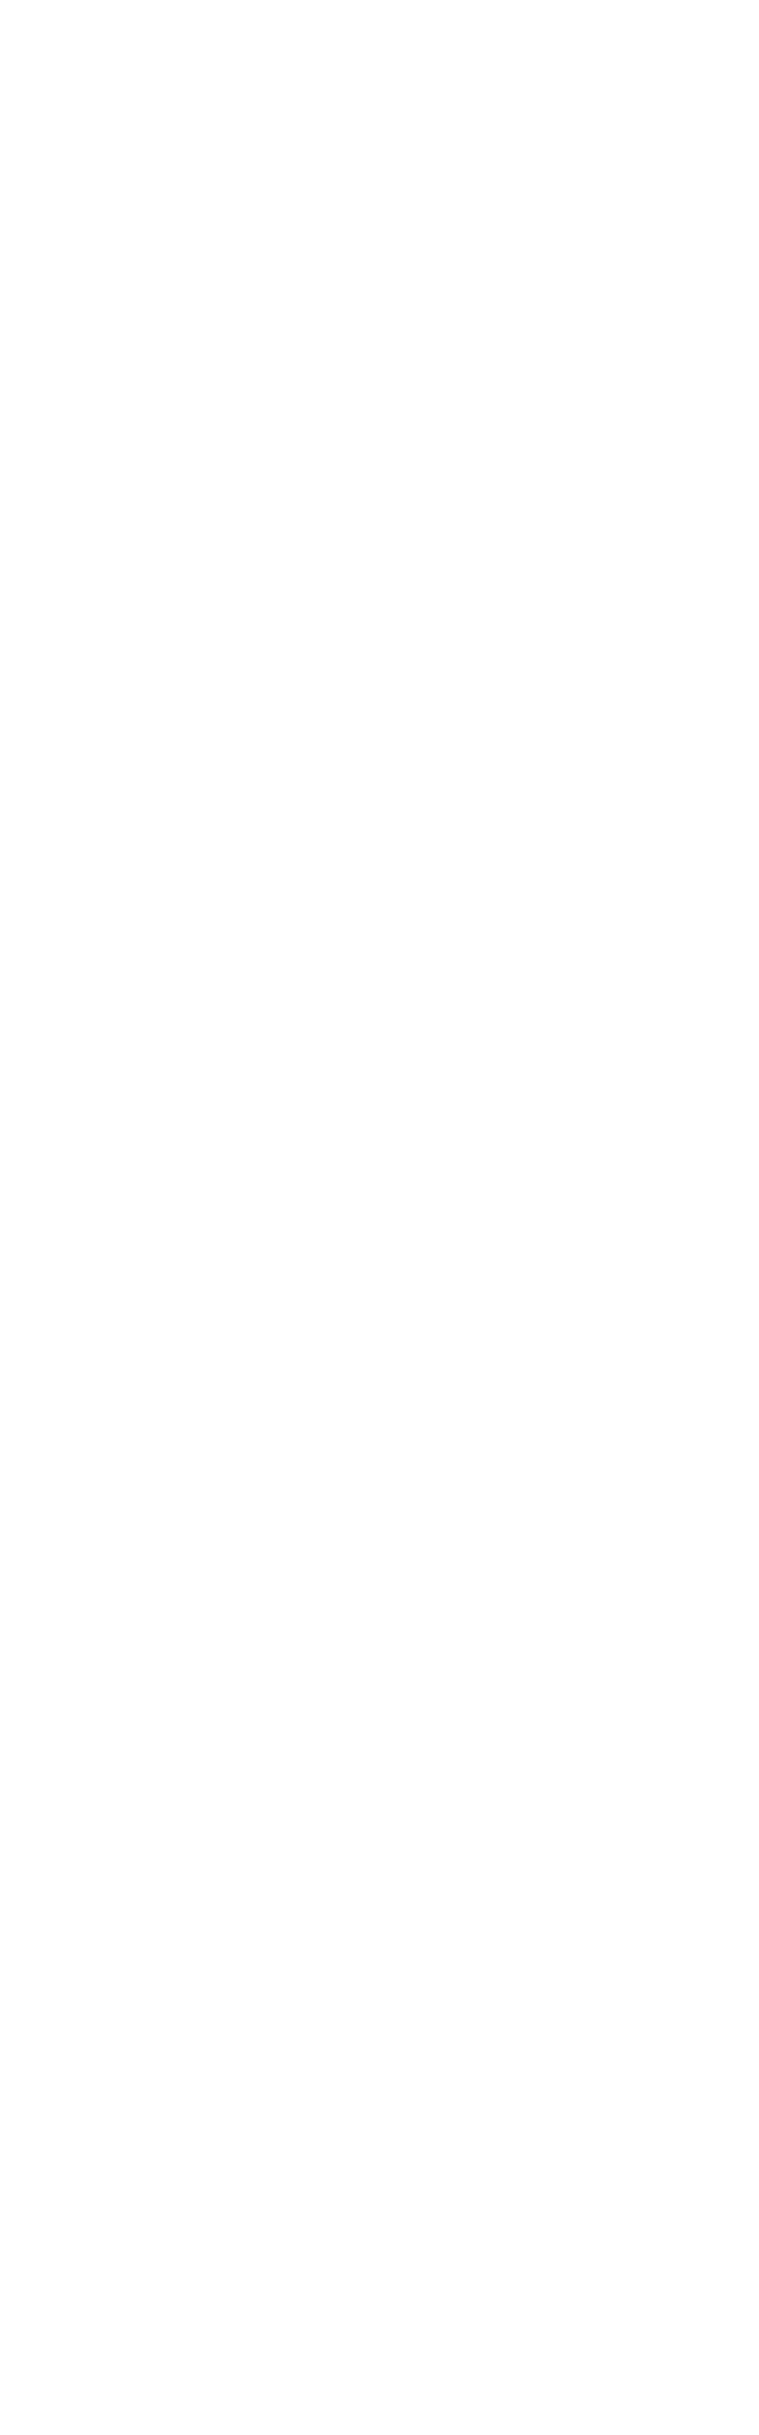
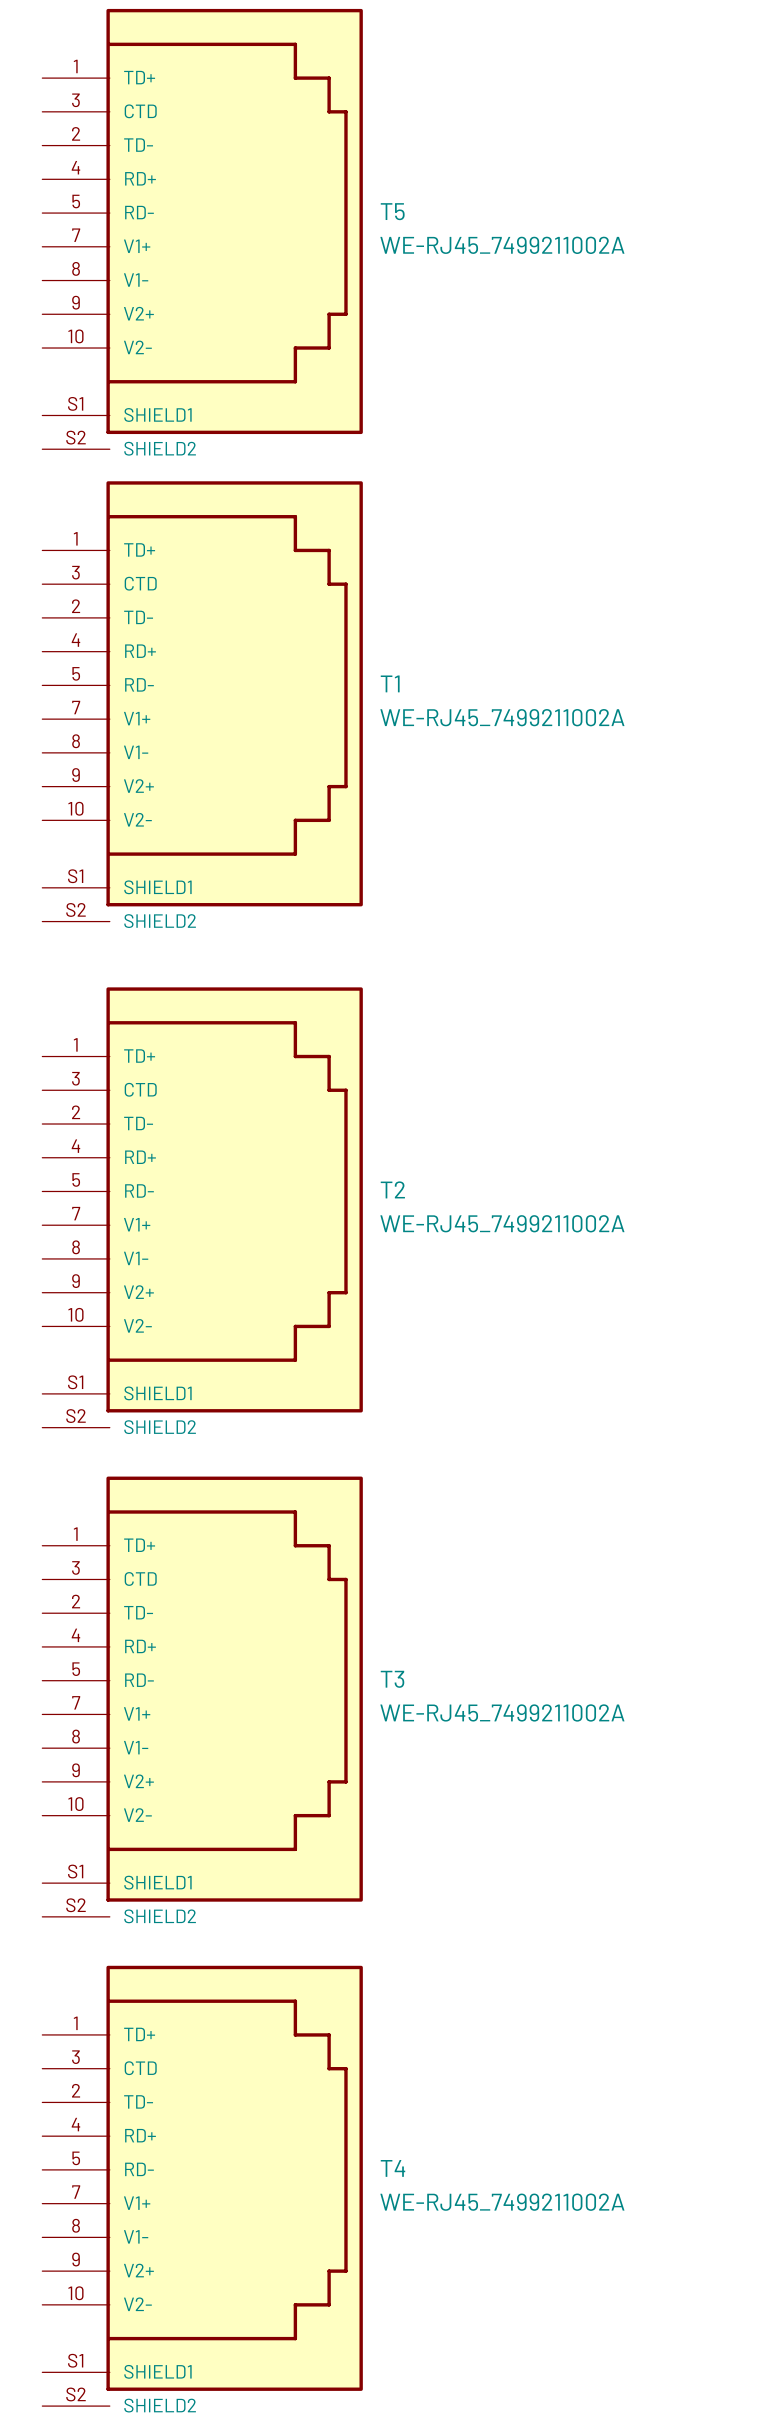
T5: none -> WE-RJ45_7499211002A (202, 229)
T1: none -> WE-RJ45_7499211002A (202, 701)
T2: none -> WE-RJ45_7499211002A (202, 1207)
T3: none -> WE-RJ45_7499211002A (202, 1696)
T4: none -> WE-RJ45_7499211002A (202, 2185)

